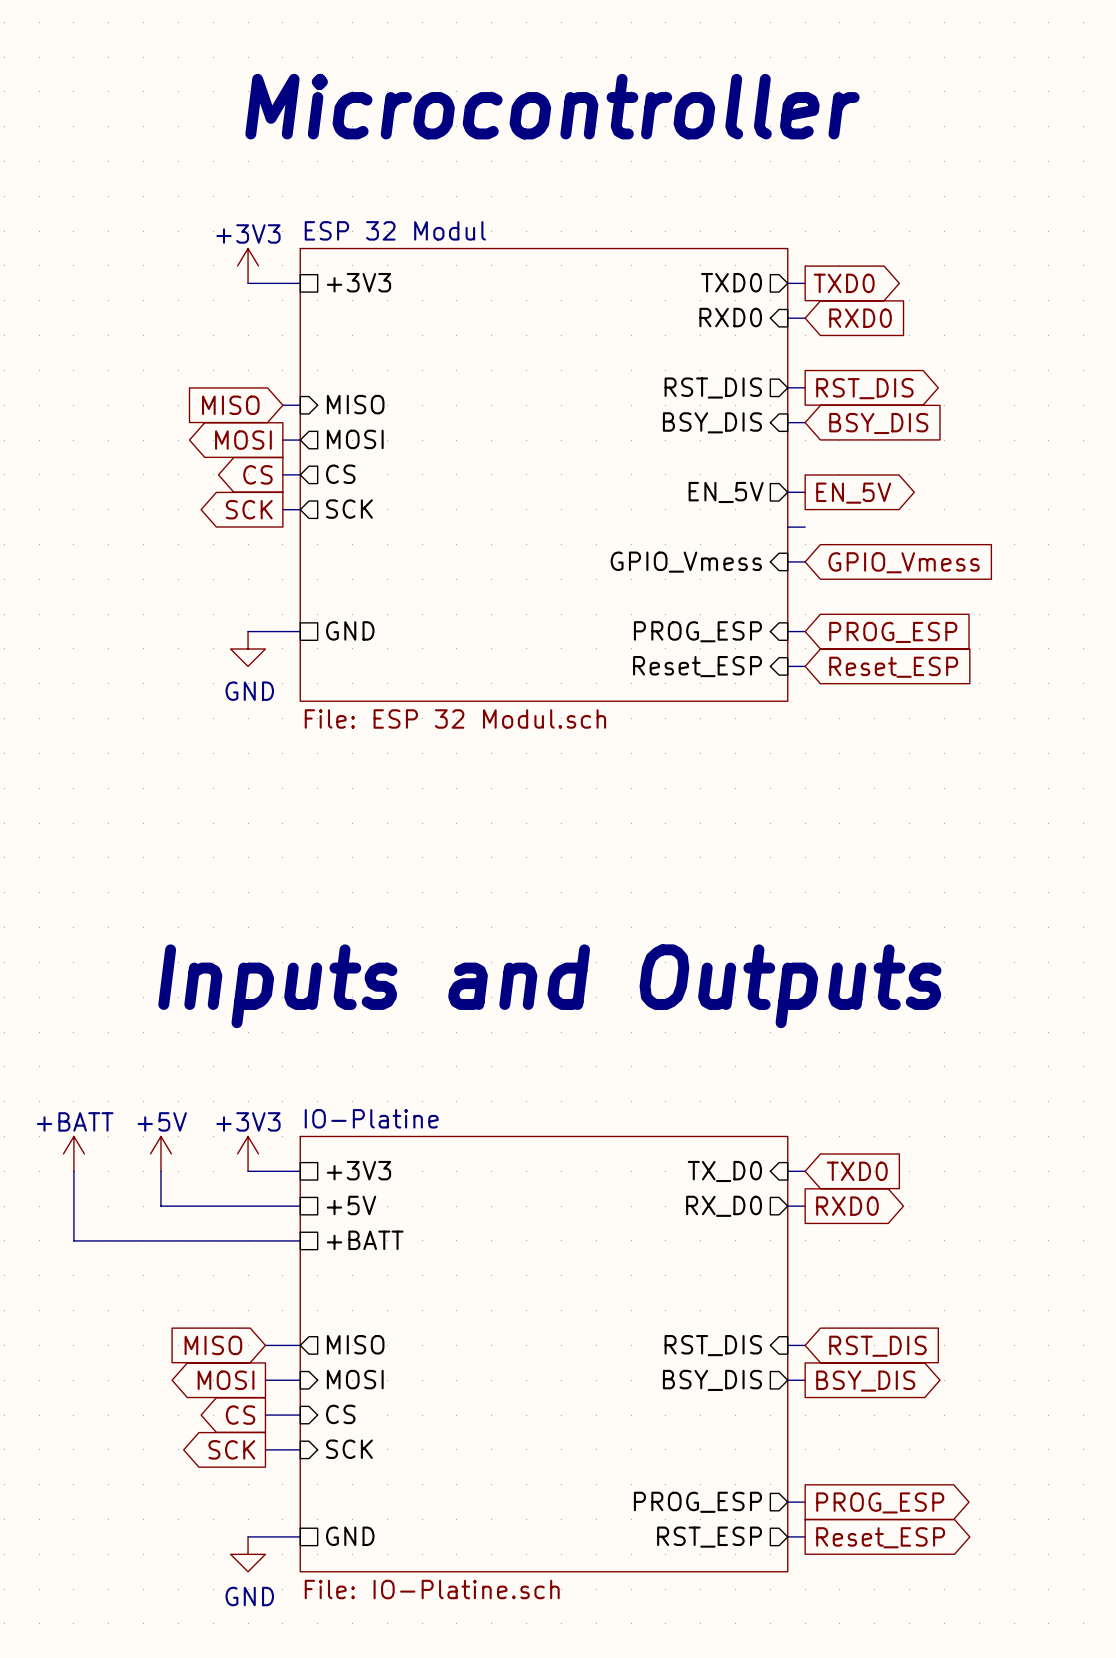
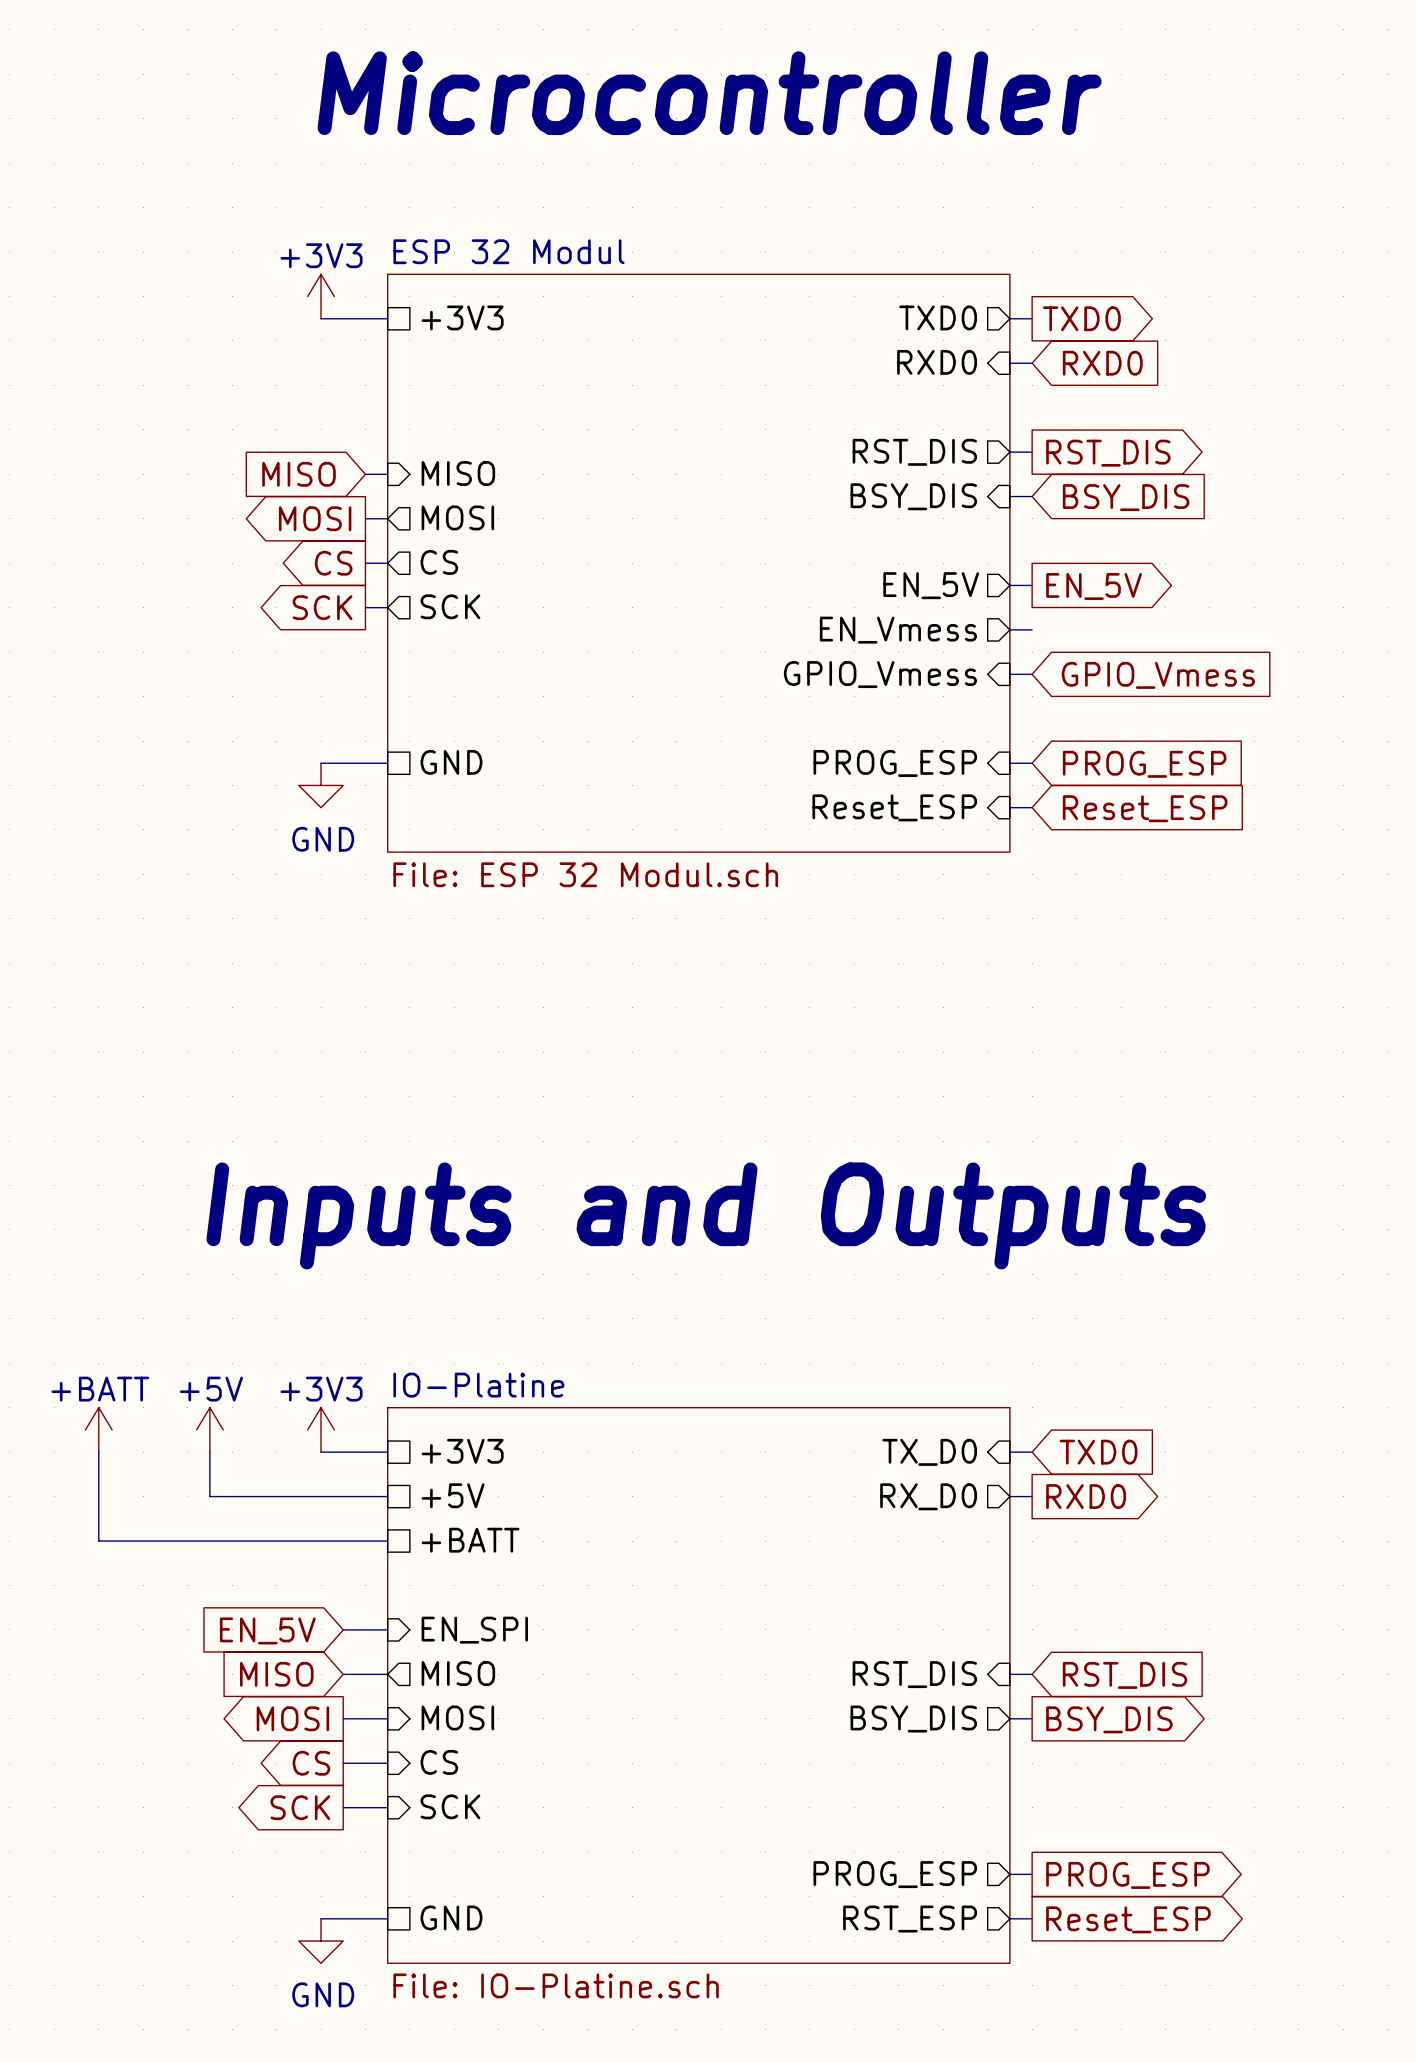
sheet pin: none -> EN_Vmess (898, 630)
wire: none -> (343, 1629) (387, 1629)
sheet pin: none -> EN_SPI (474, 1630)
global label: none -> EN_5V (267, 1630)

